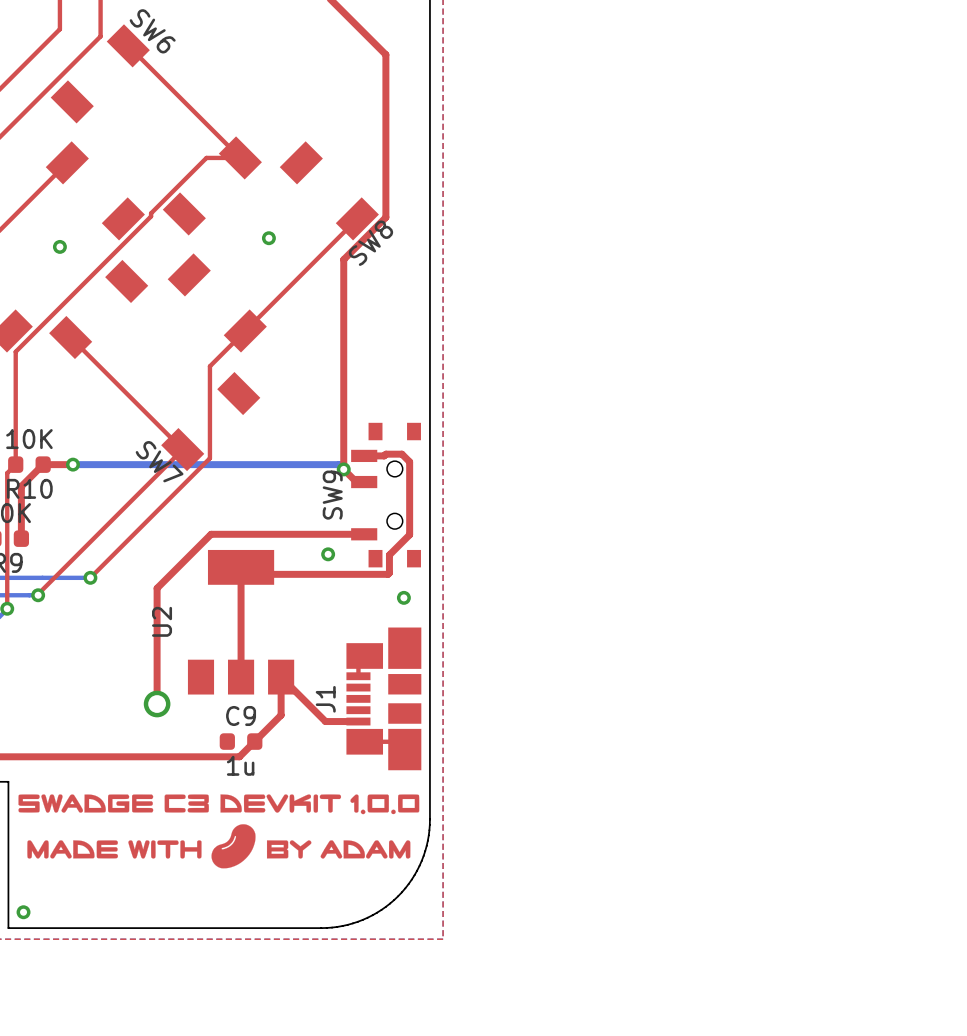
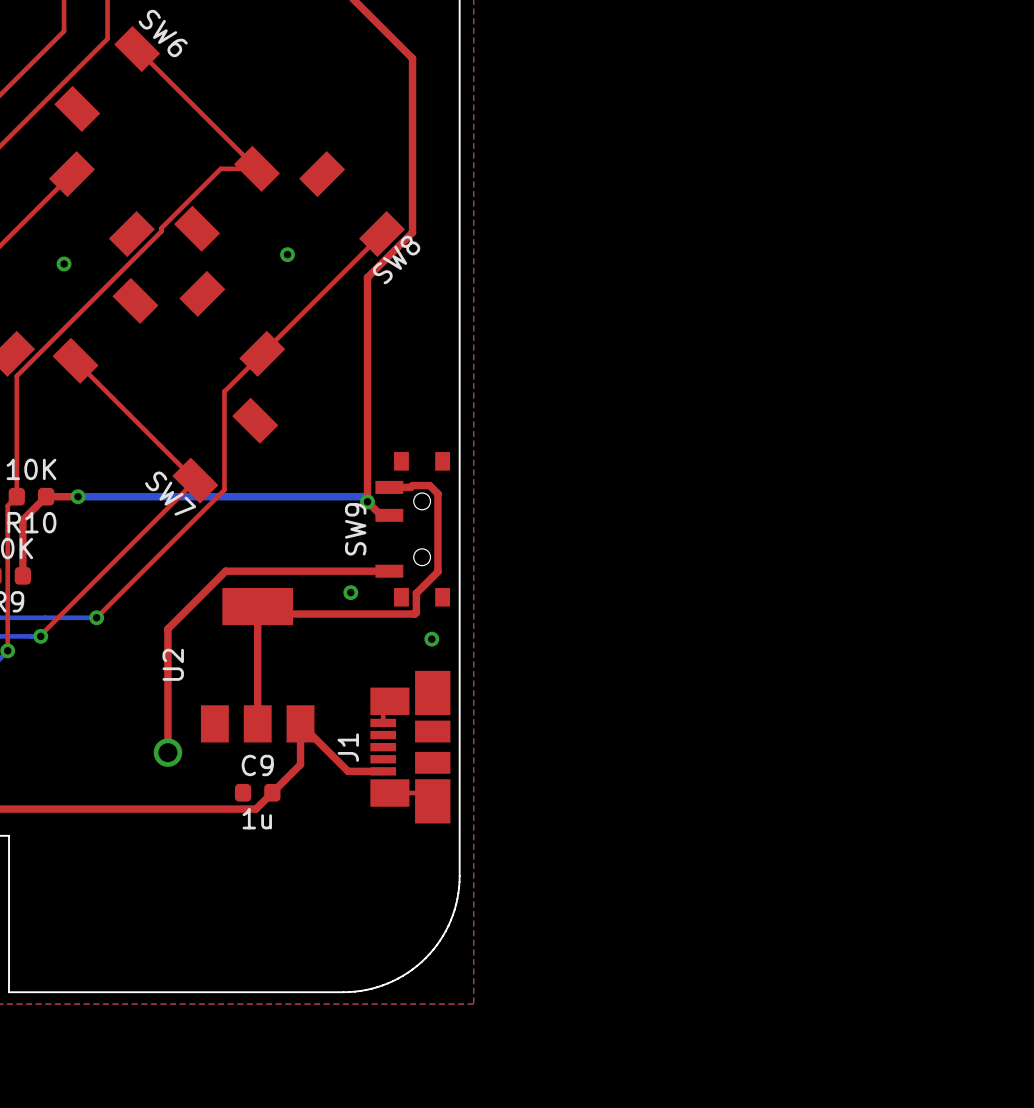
drawing: [18, 794, 420, 869] -> none
via: (23, 912) -> none

